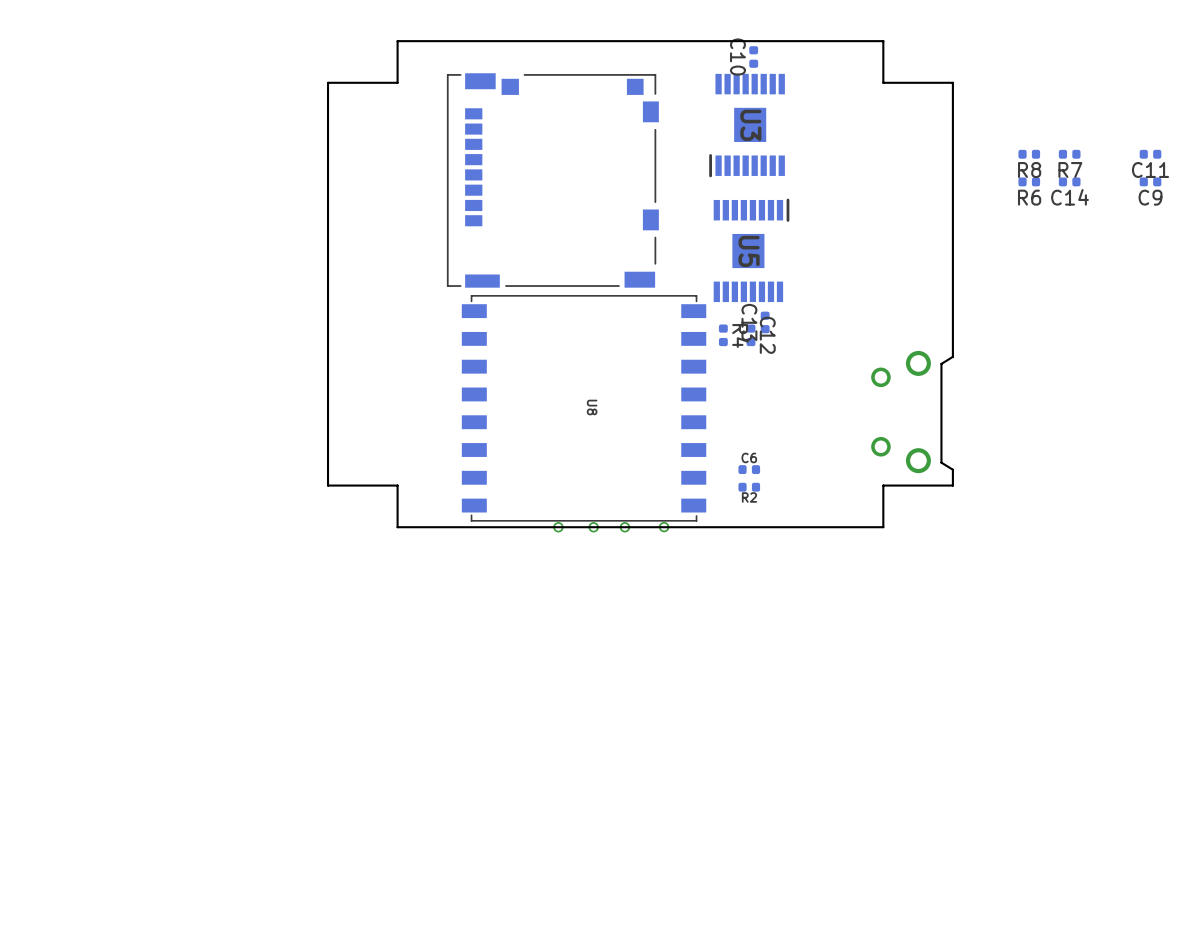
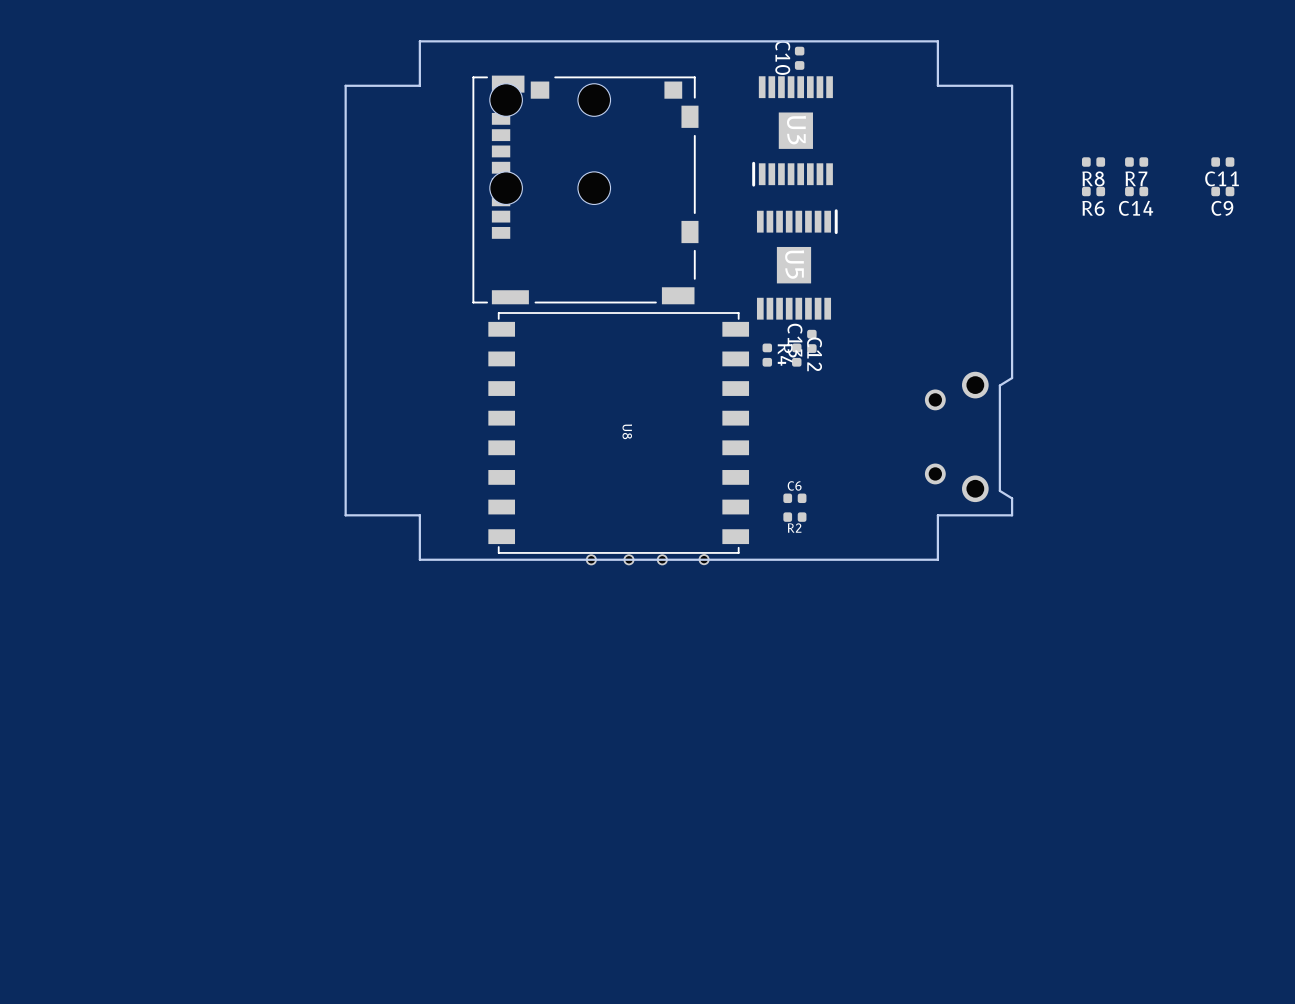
part: none -> (506, 100)
part: none -> (594, 100)
part: none -> (506, 188)
part: none -> (594, 188)

